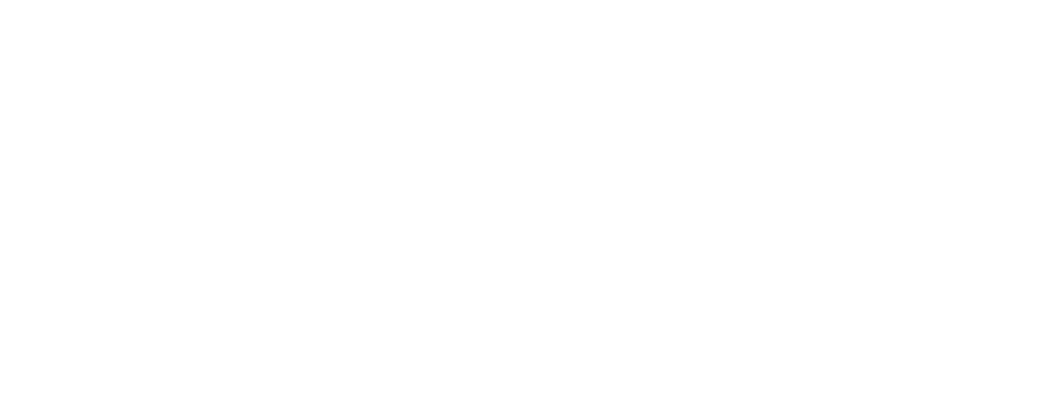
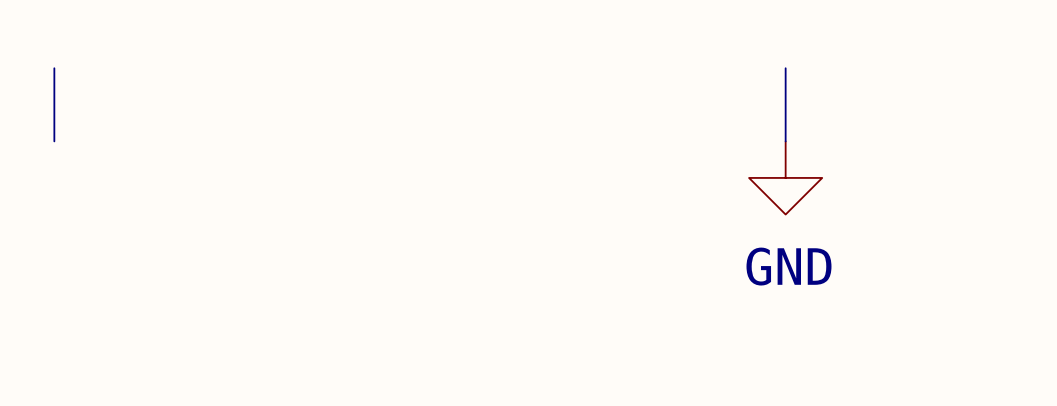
wire: none -> (54, 68) (54, 141)
wire: none -> (785, 68) (785, 141)
power symbol: none -> GND (785, 177)

